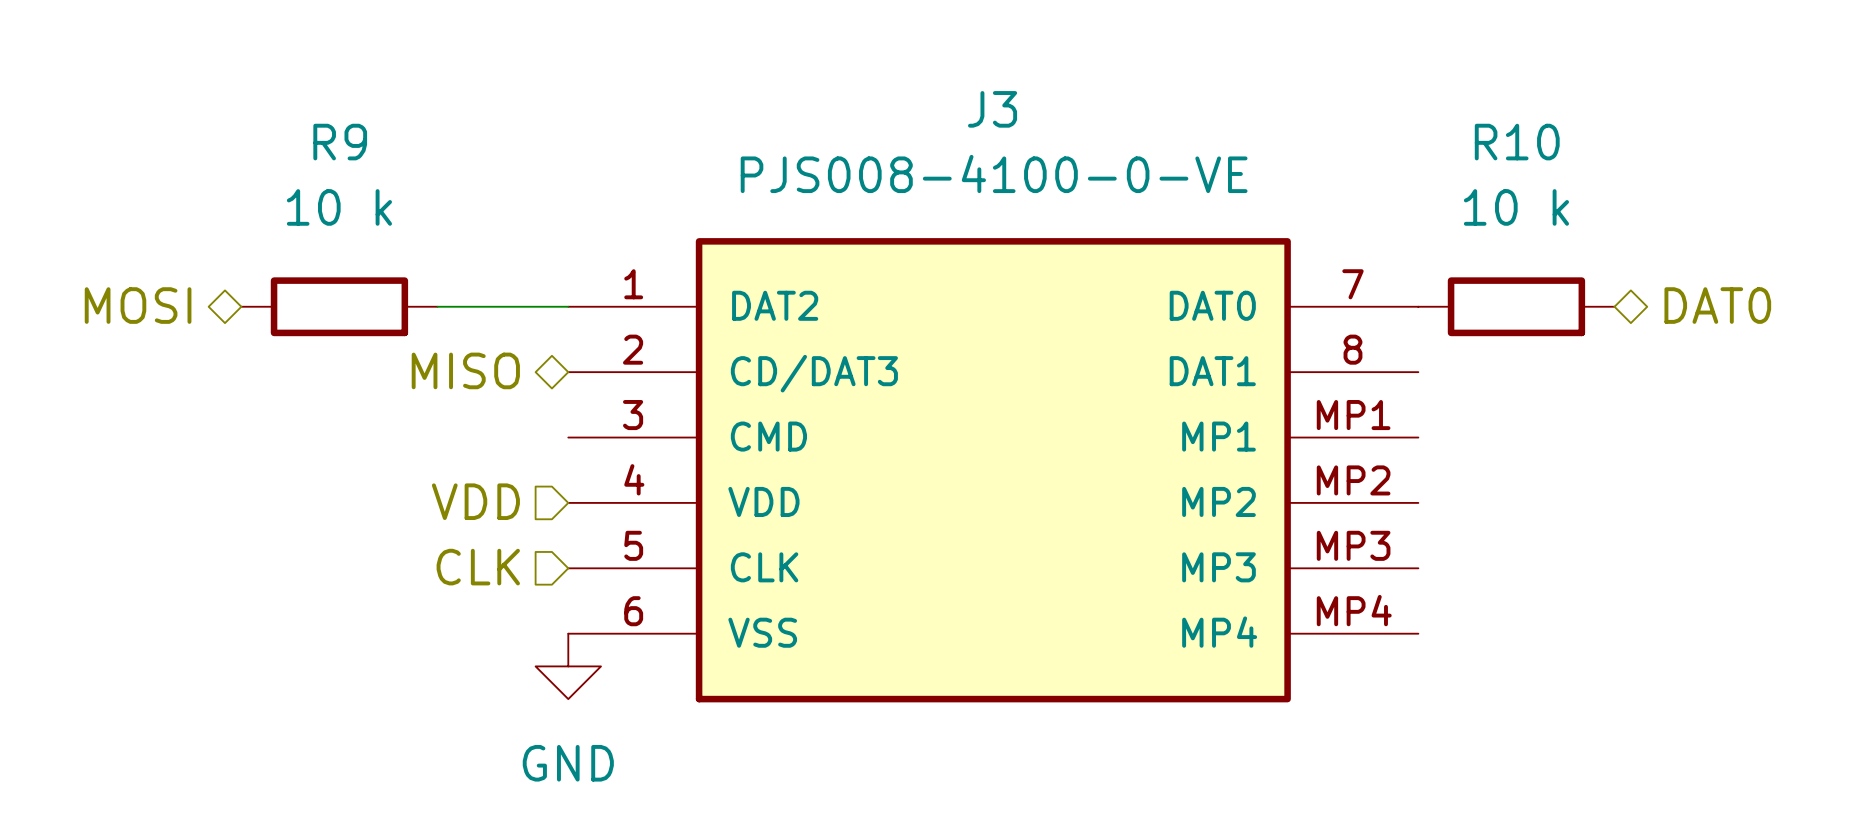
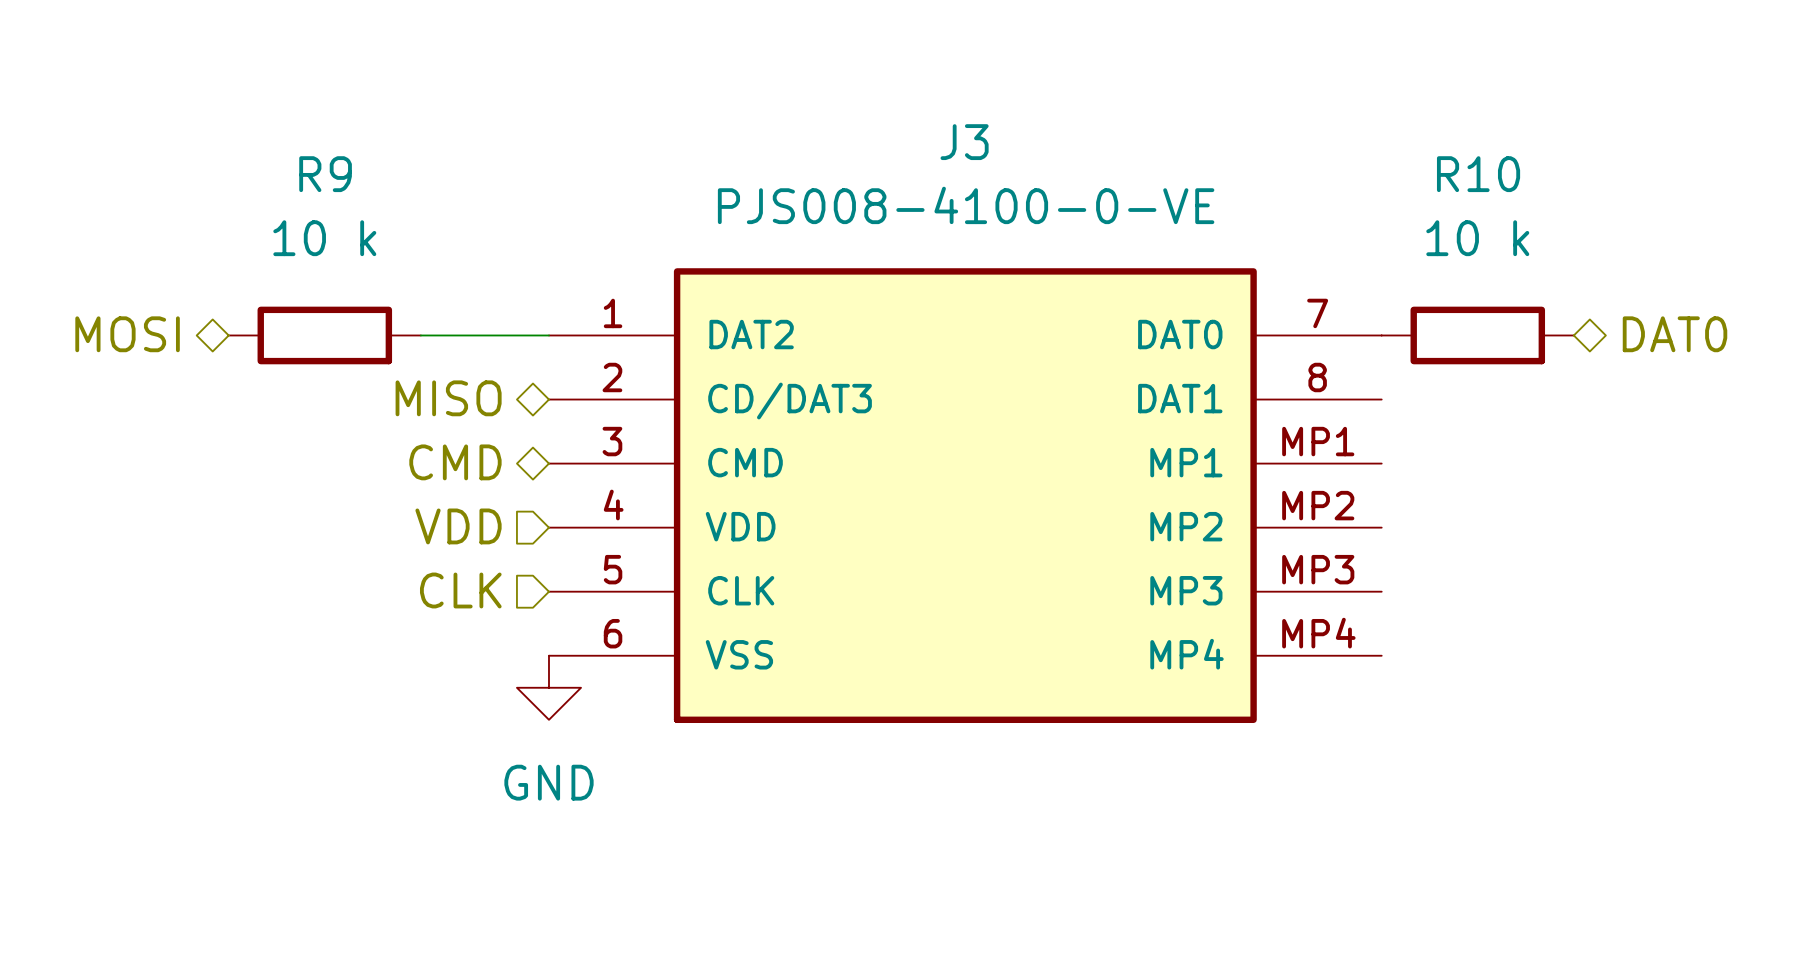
hierarchical label: none -> CMD (455, 462)

